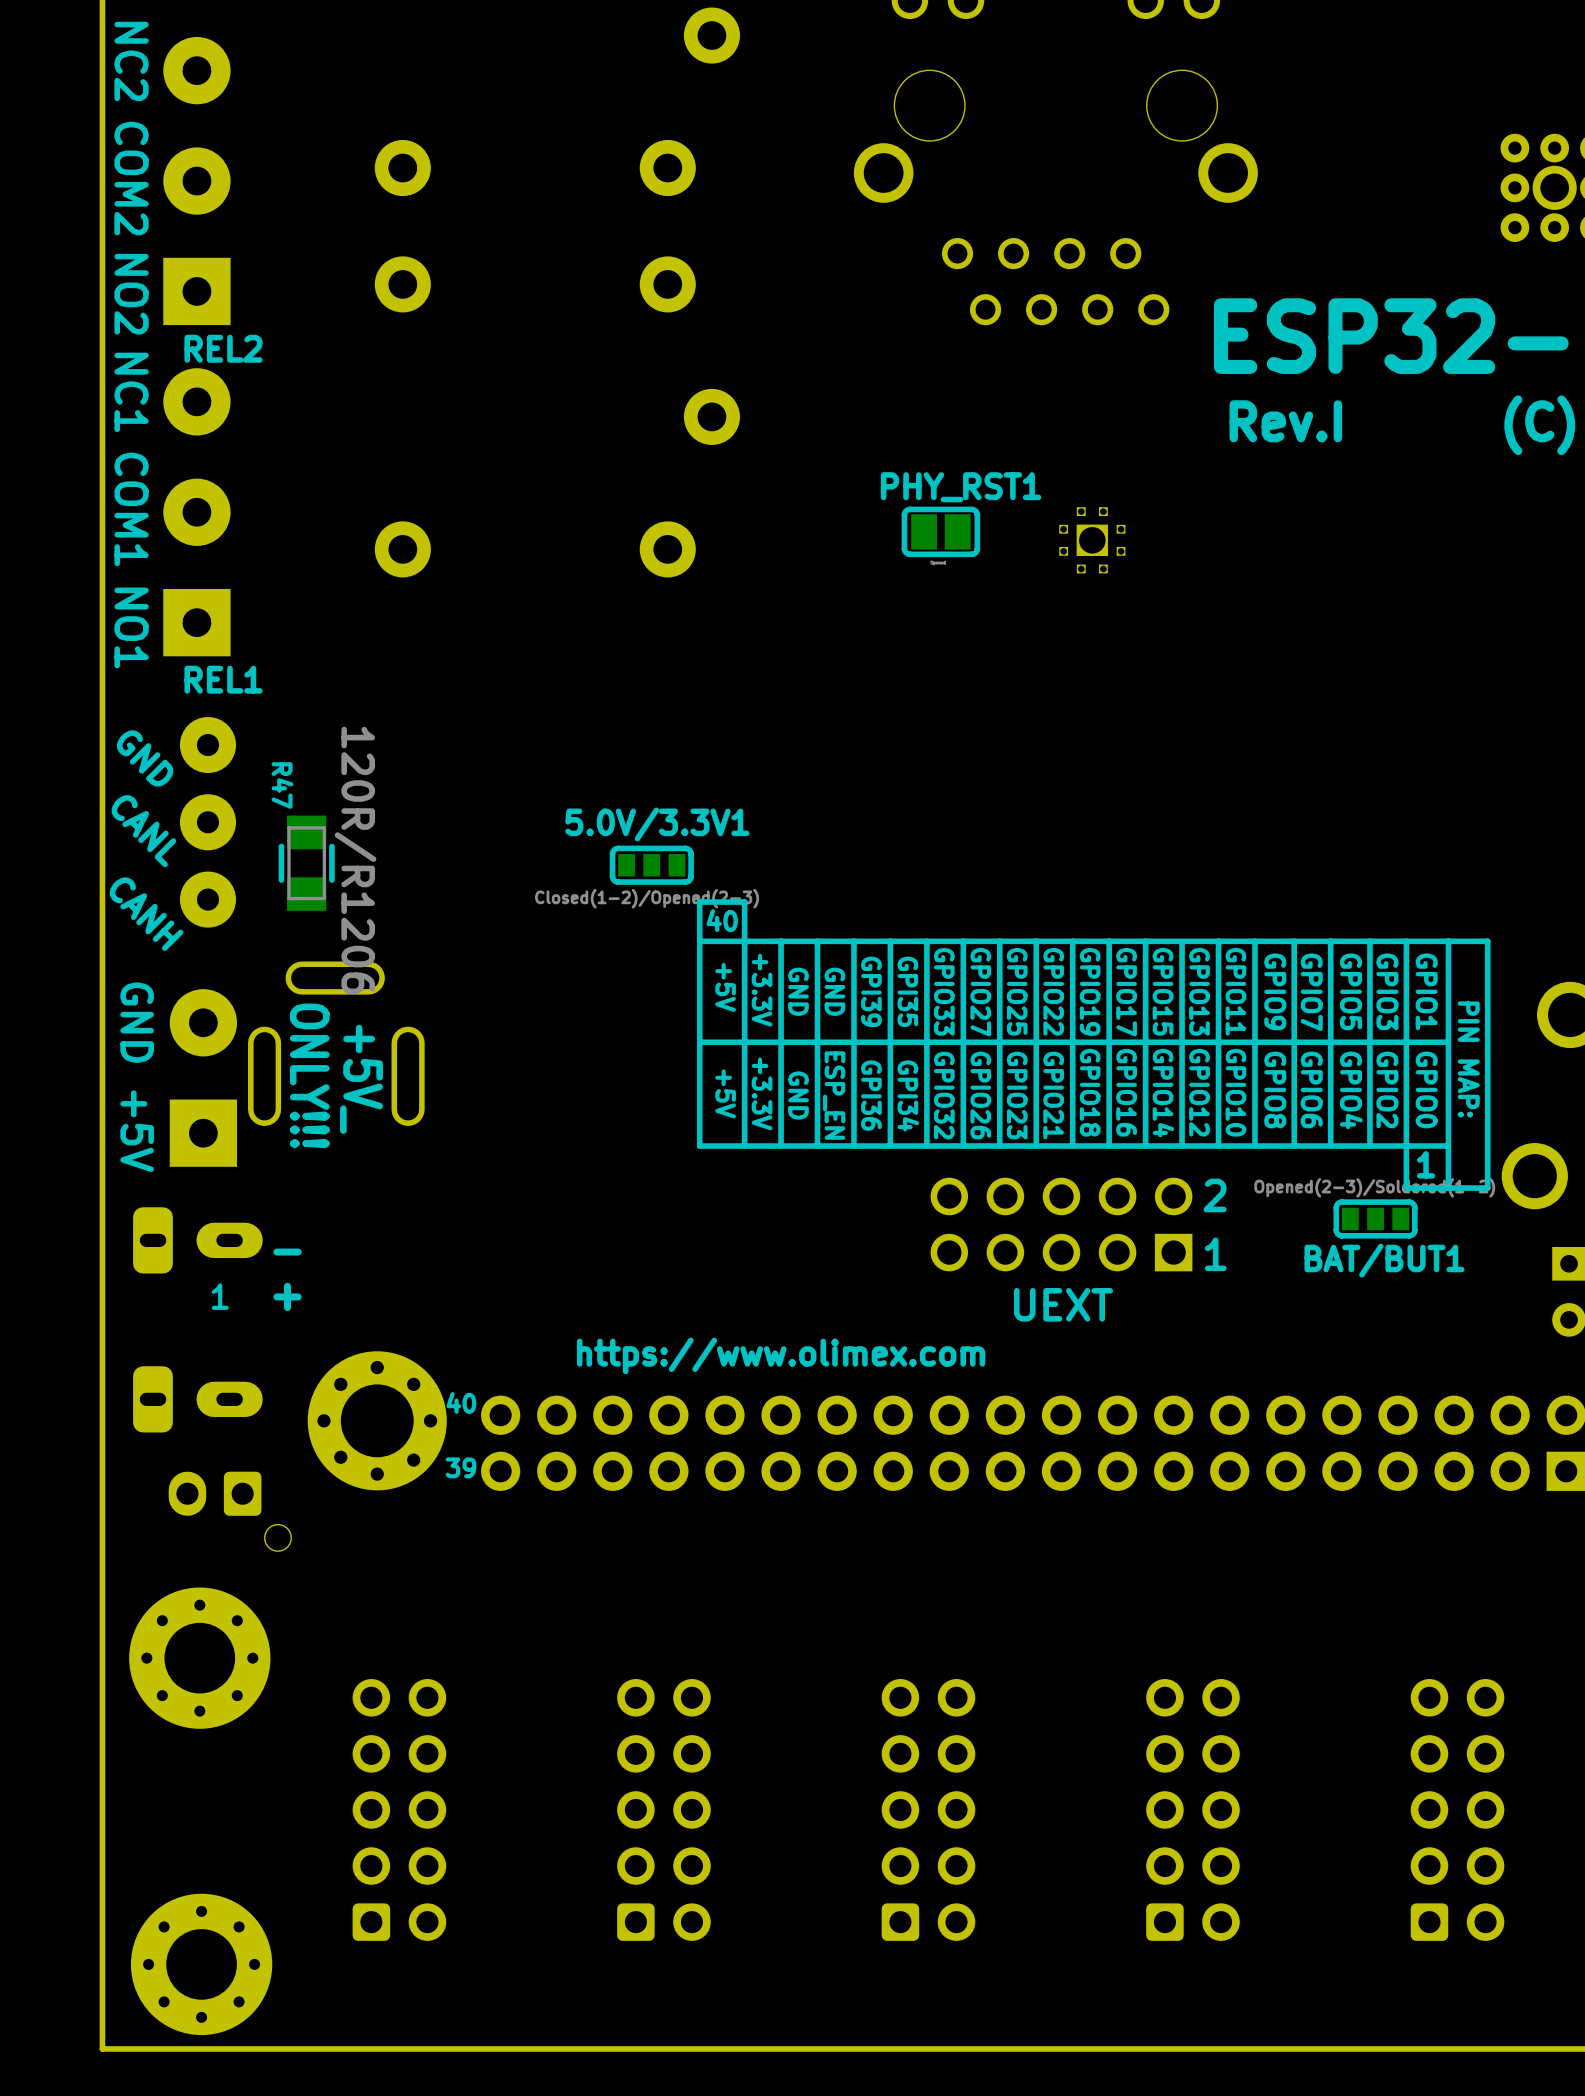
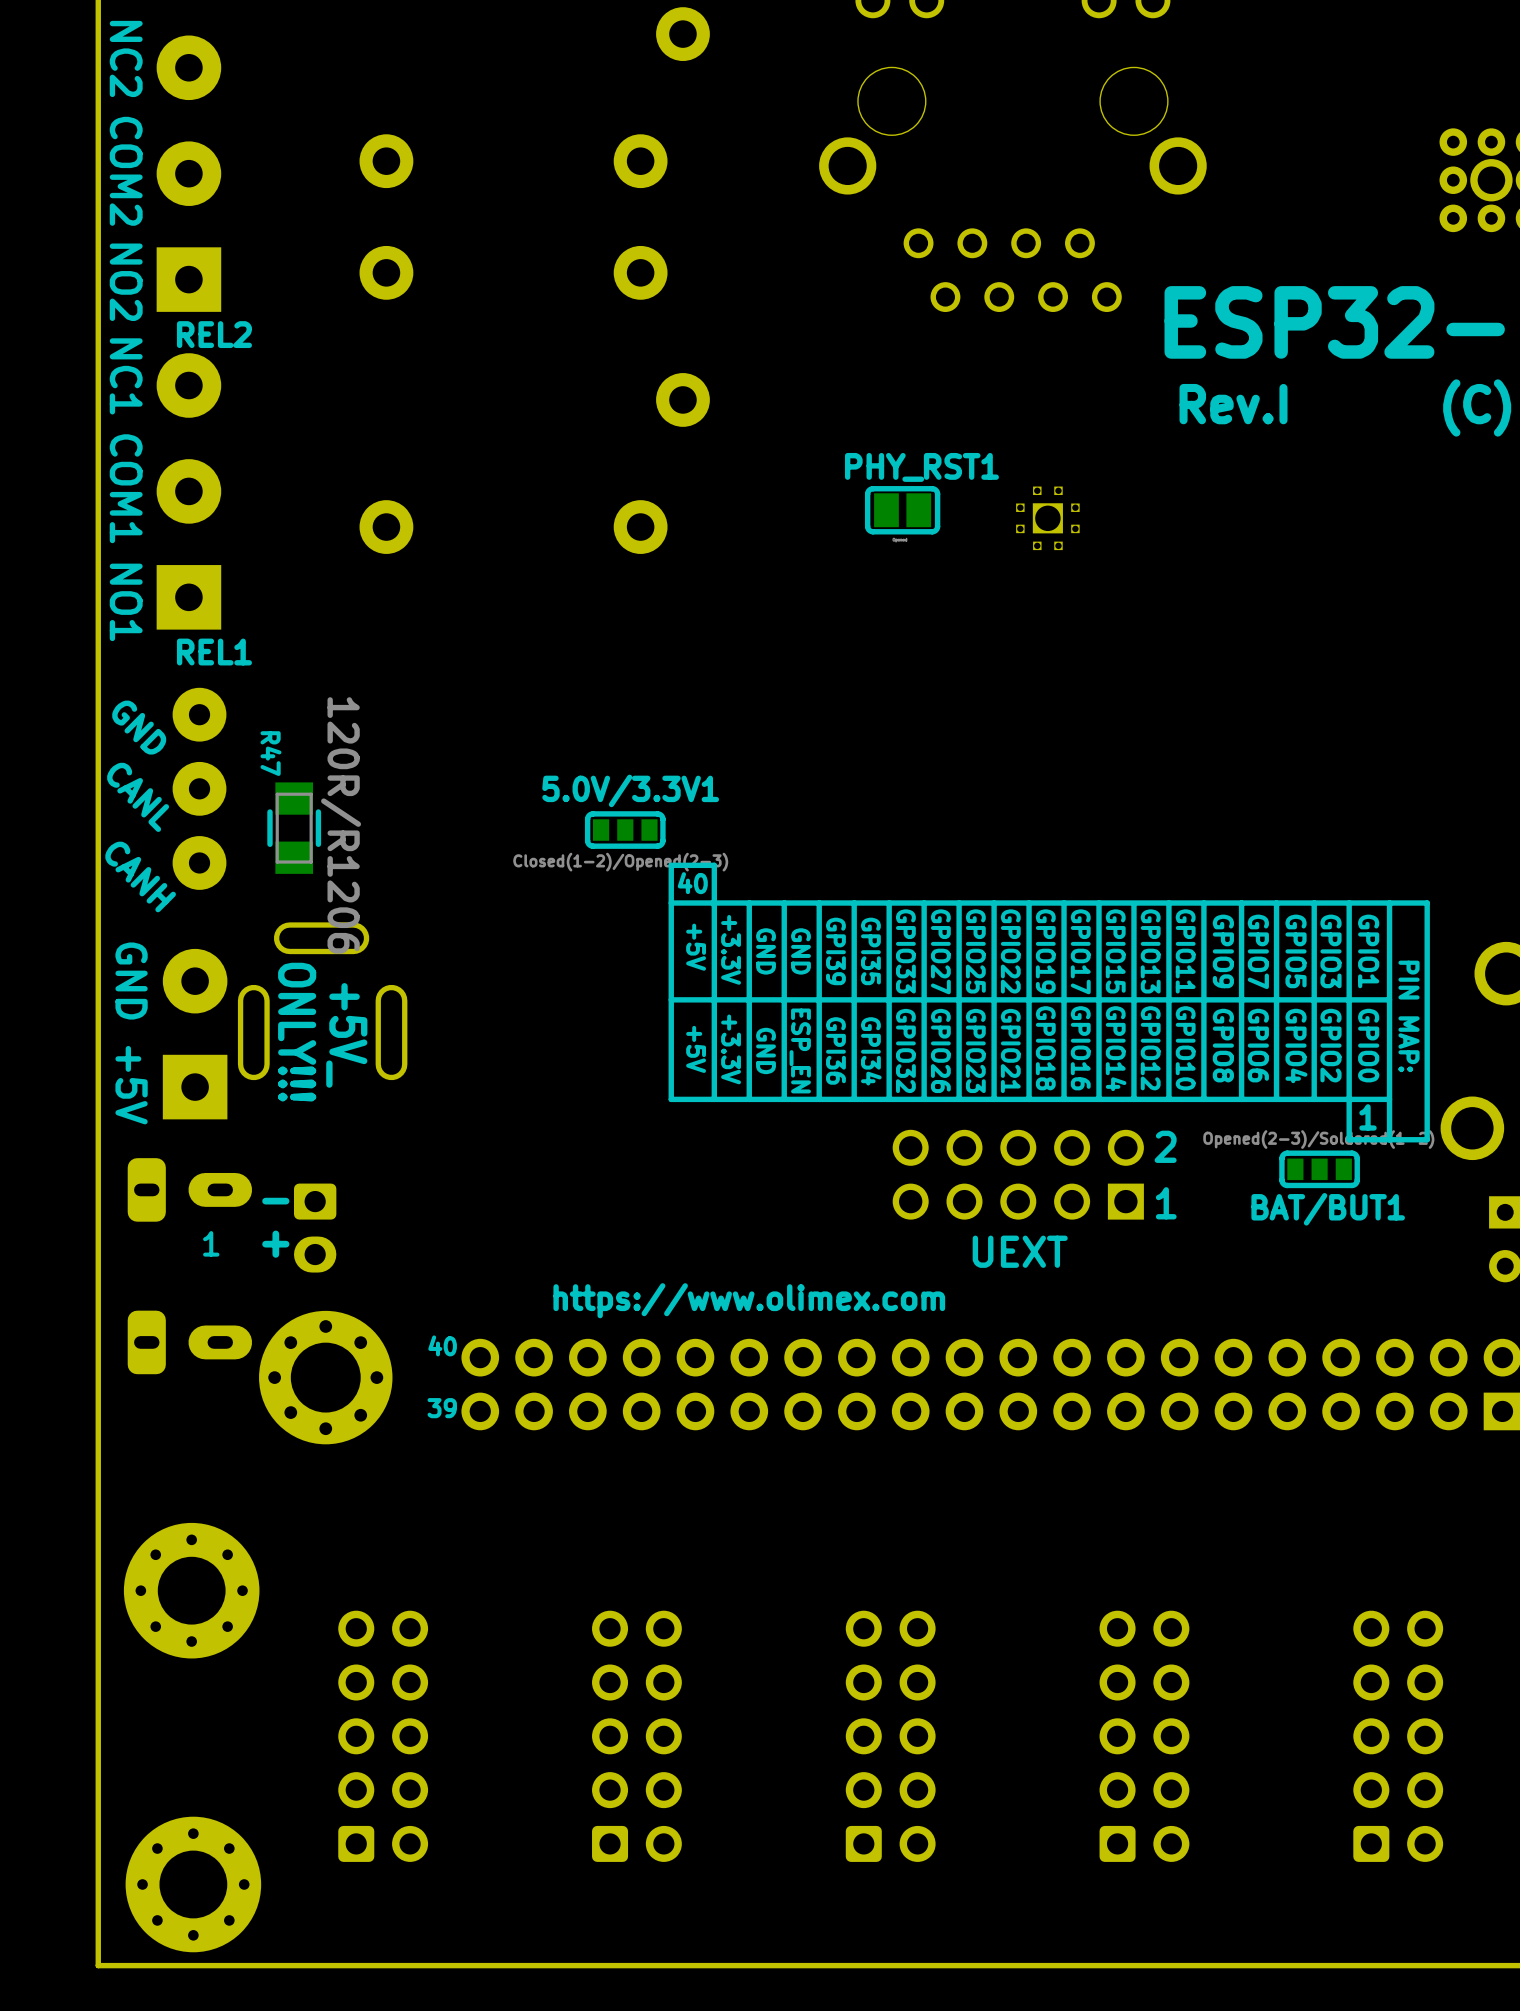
part: none -> (315, 1228)
part position: (377, 1420) -> (325, 1377)
part: (229, 1511) -> none

